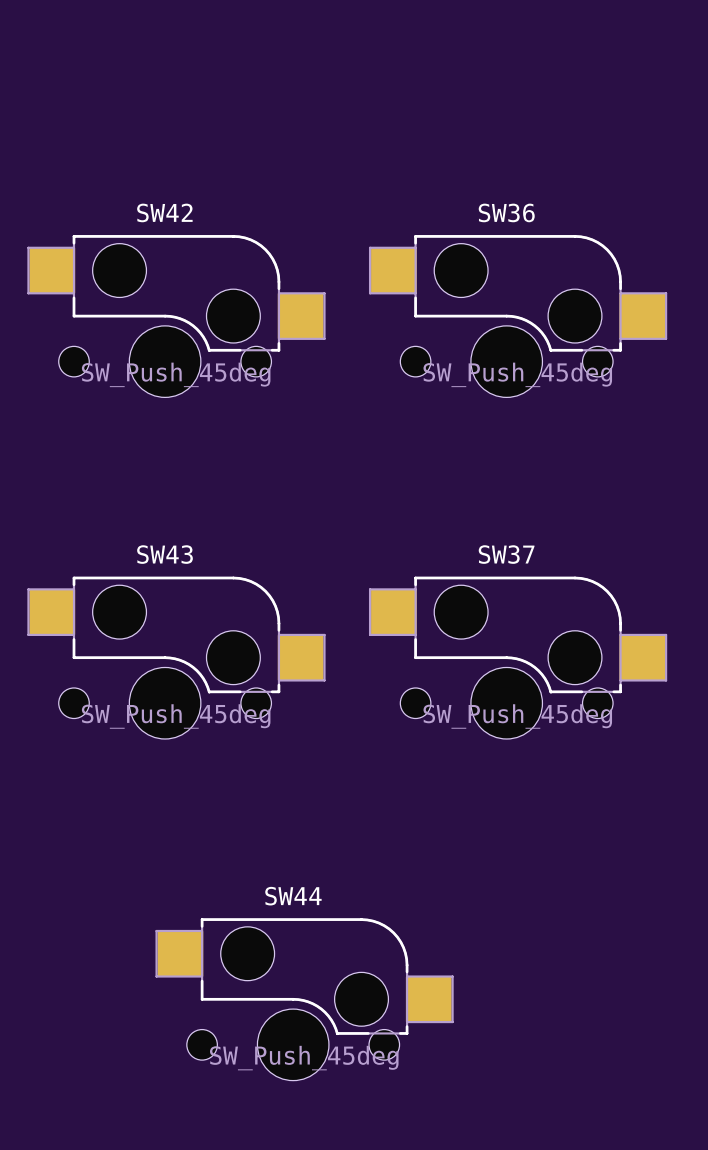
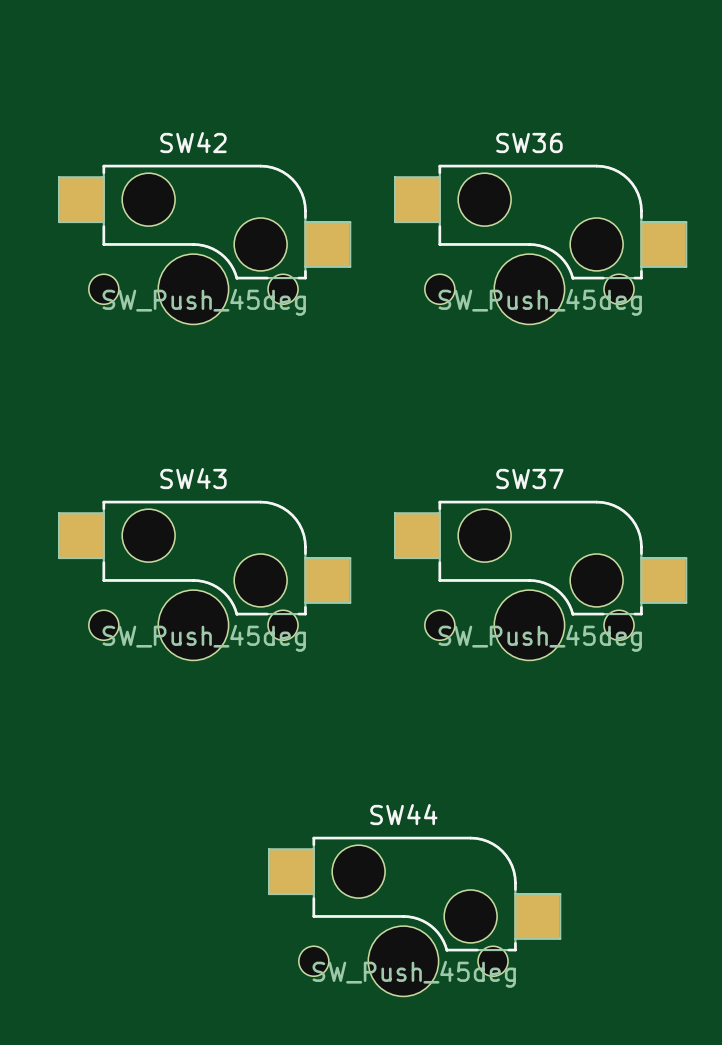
SW44 position: (304, 999) -> (414, 916)

